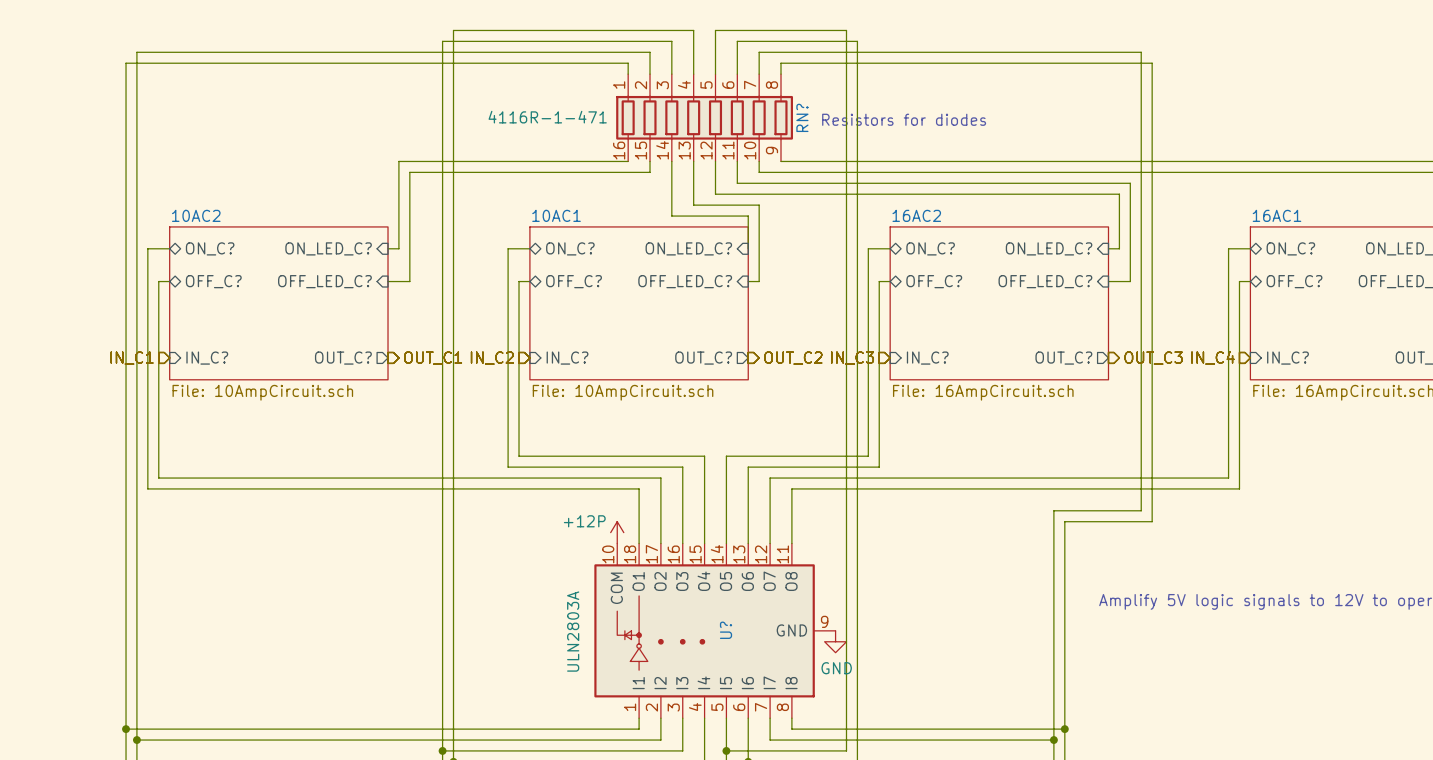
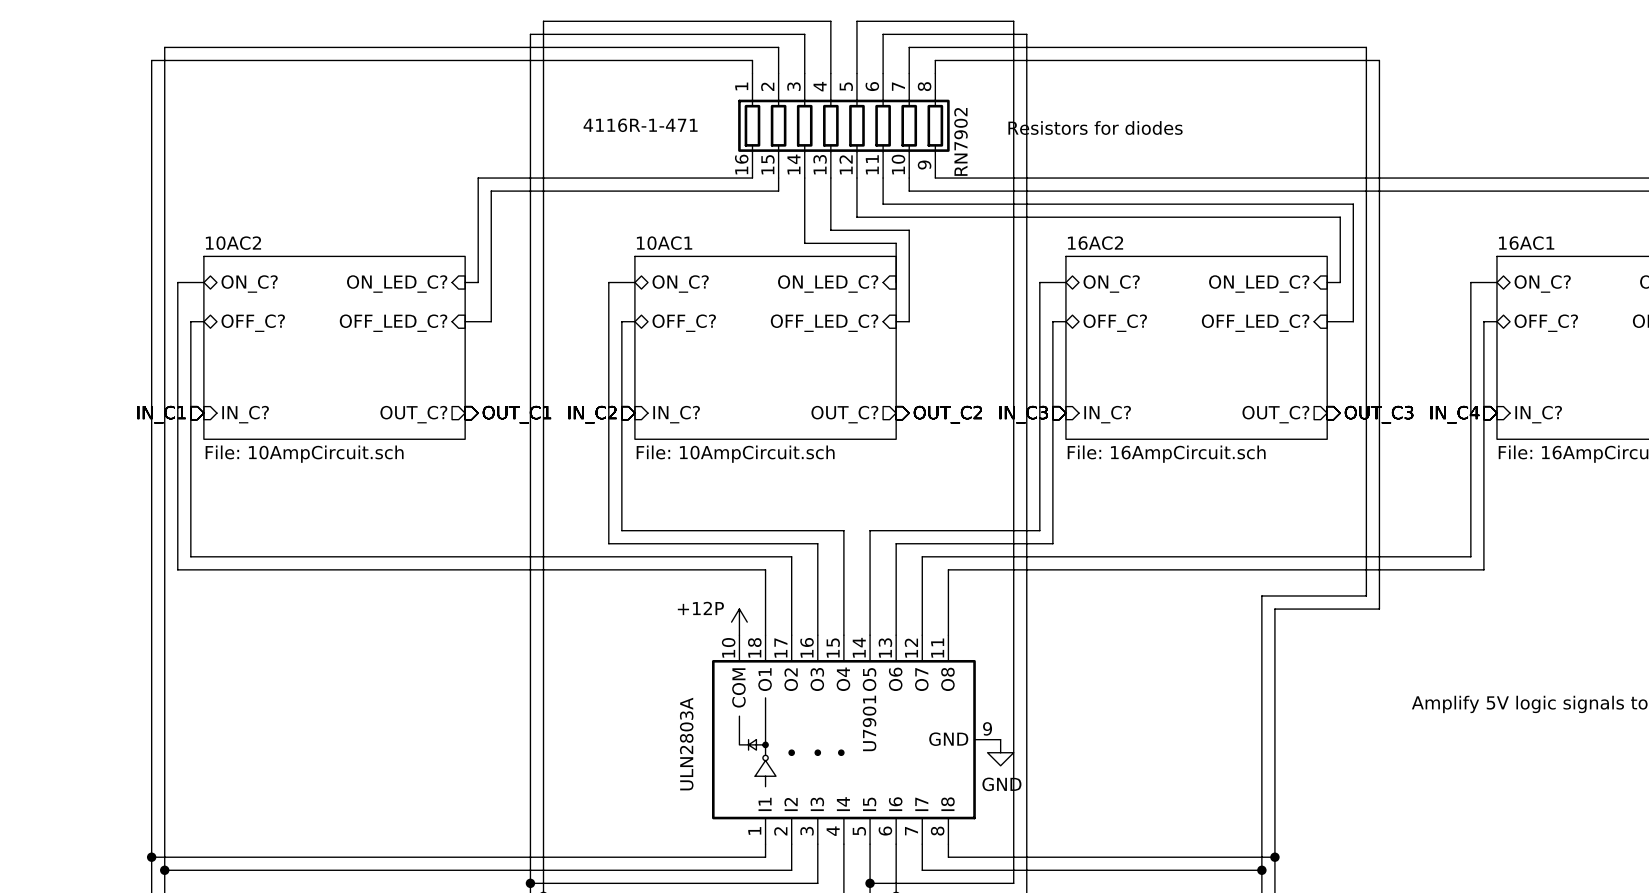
RN? name: RN? (802, 117) -> RN7902 (960, 141)
U? name: U? (726, 630) -> U7901 (869, 723)

